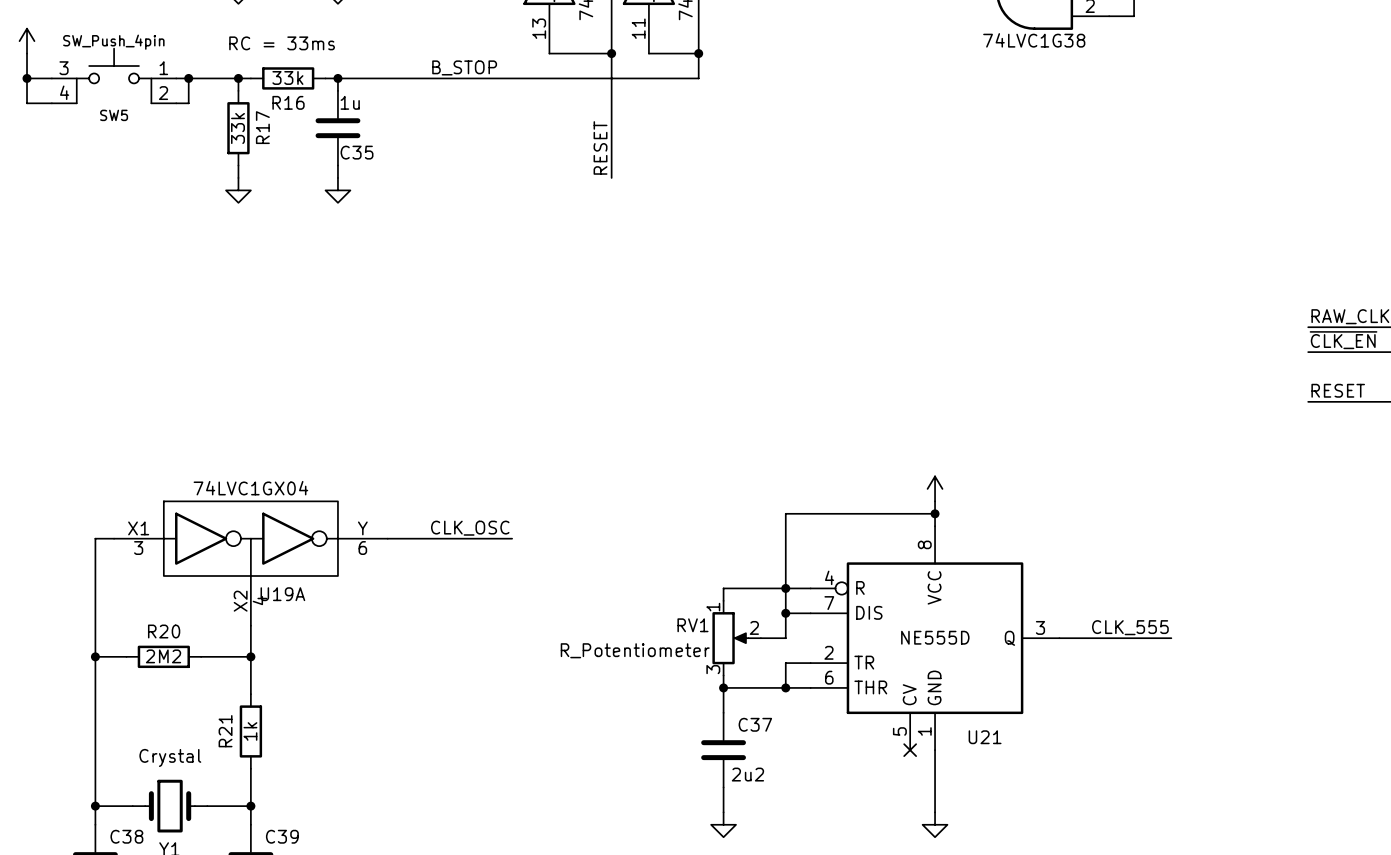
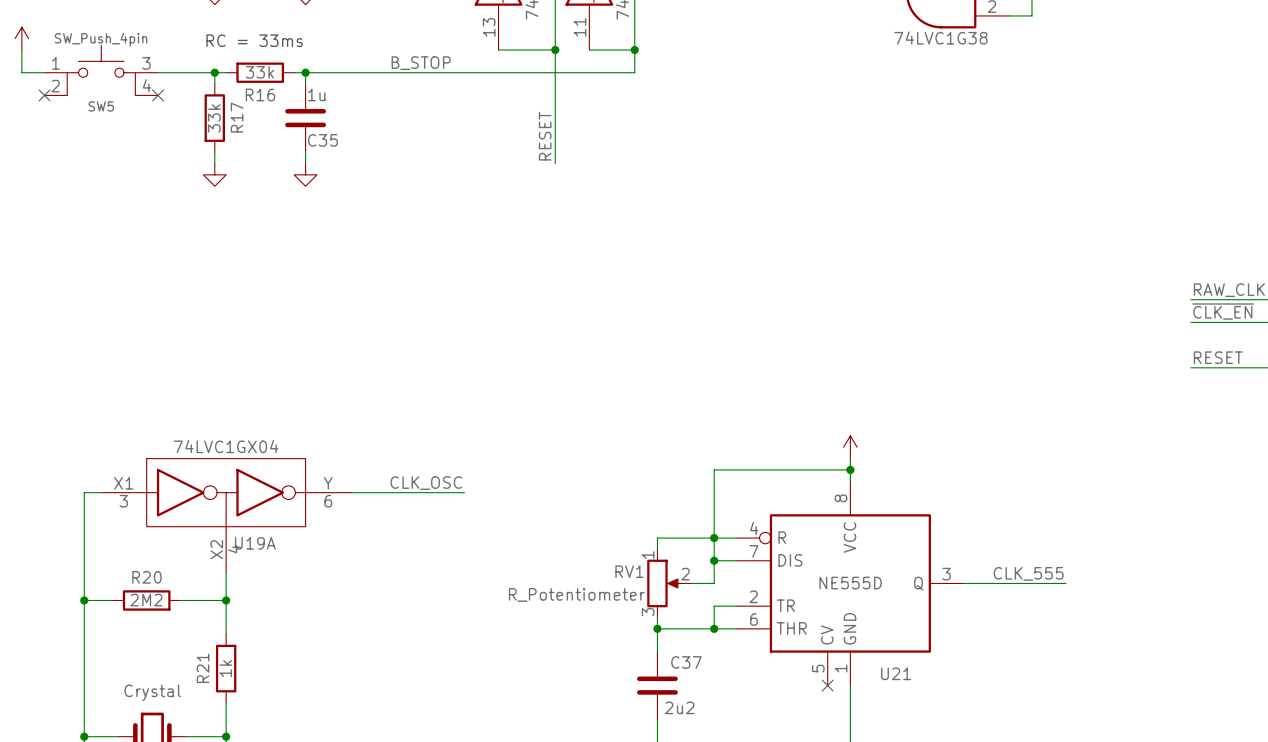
SW5 flip: as is (114, 75) -> left-right (101, 70)
wire: (27, 78) (27, 103) (51, 103) -> none
junction: (27, 78) -> none
wire: (188, 78) (188, 103) (176, 103) -> none
junction: (188, 78) -> none
no-connect mark: none -> (44, 95)
no-connect mark: none -> (158, 95)

